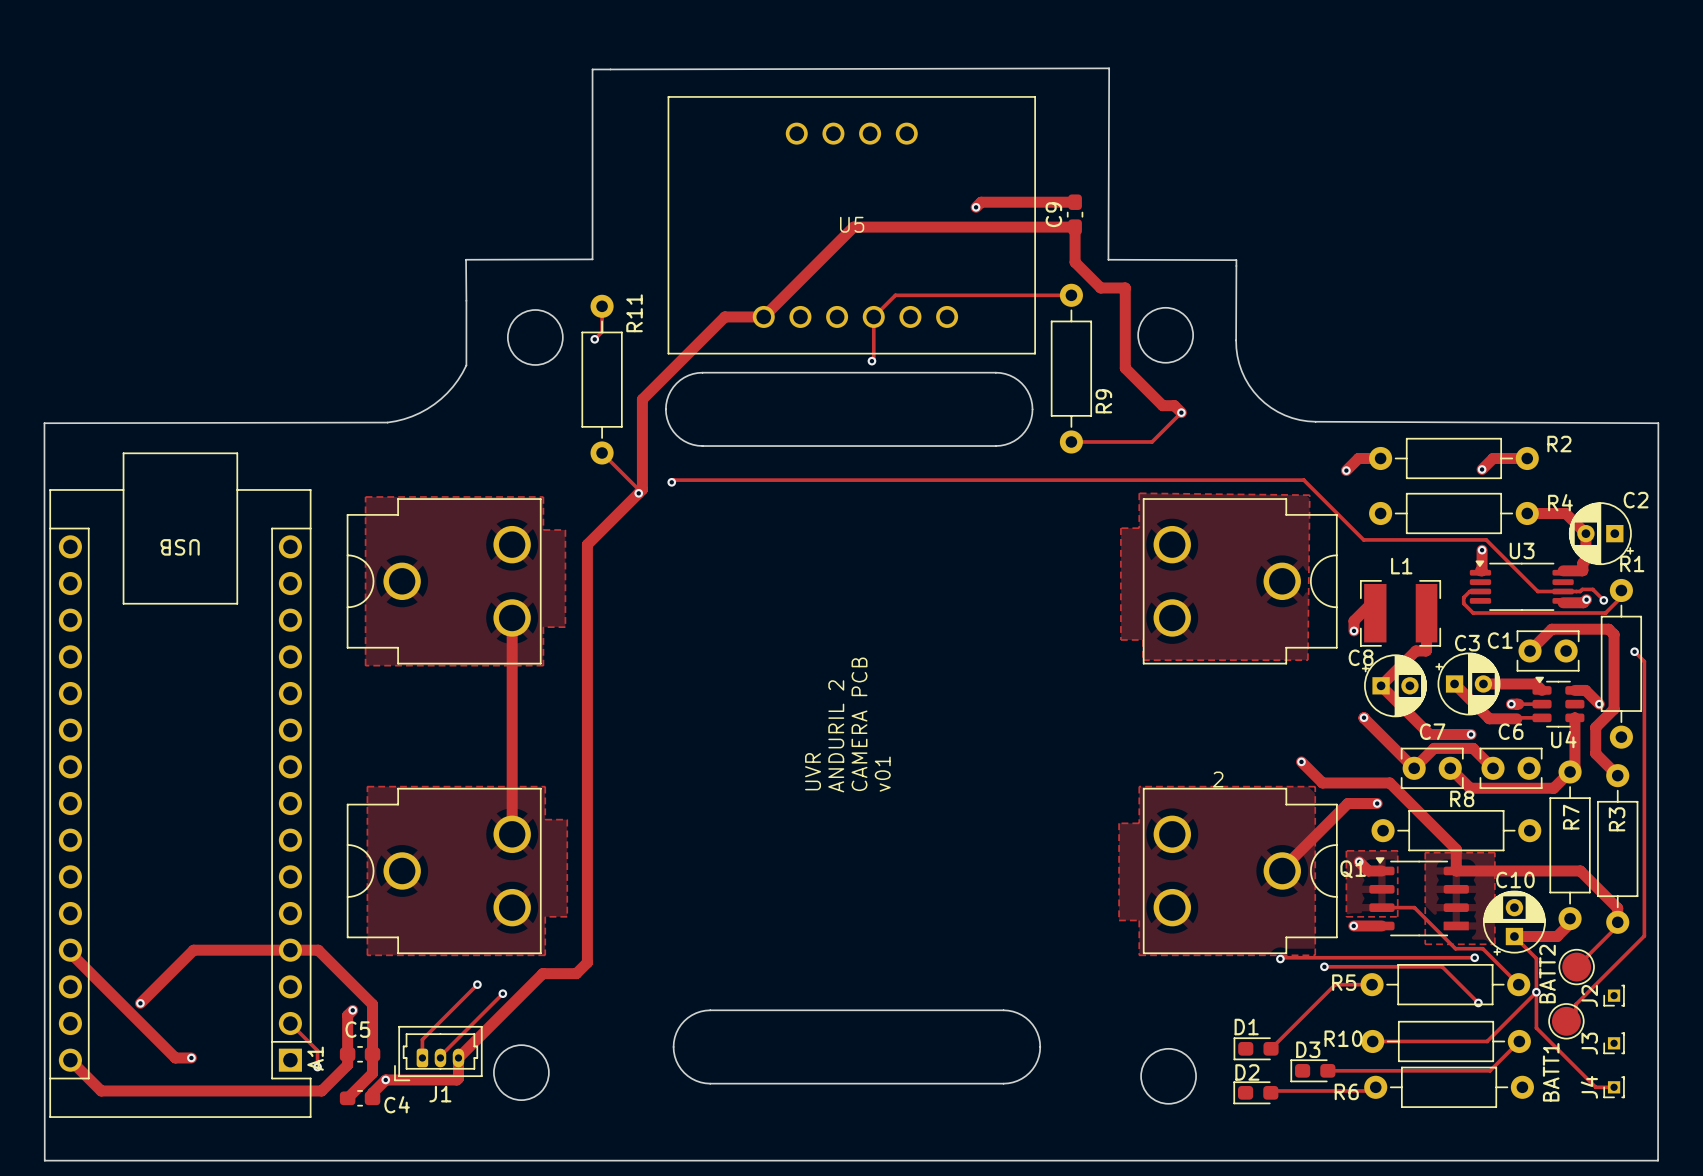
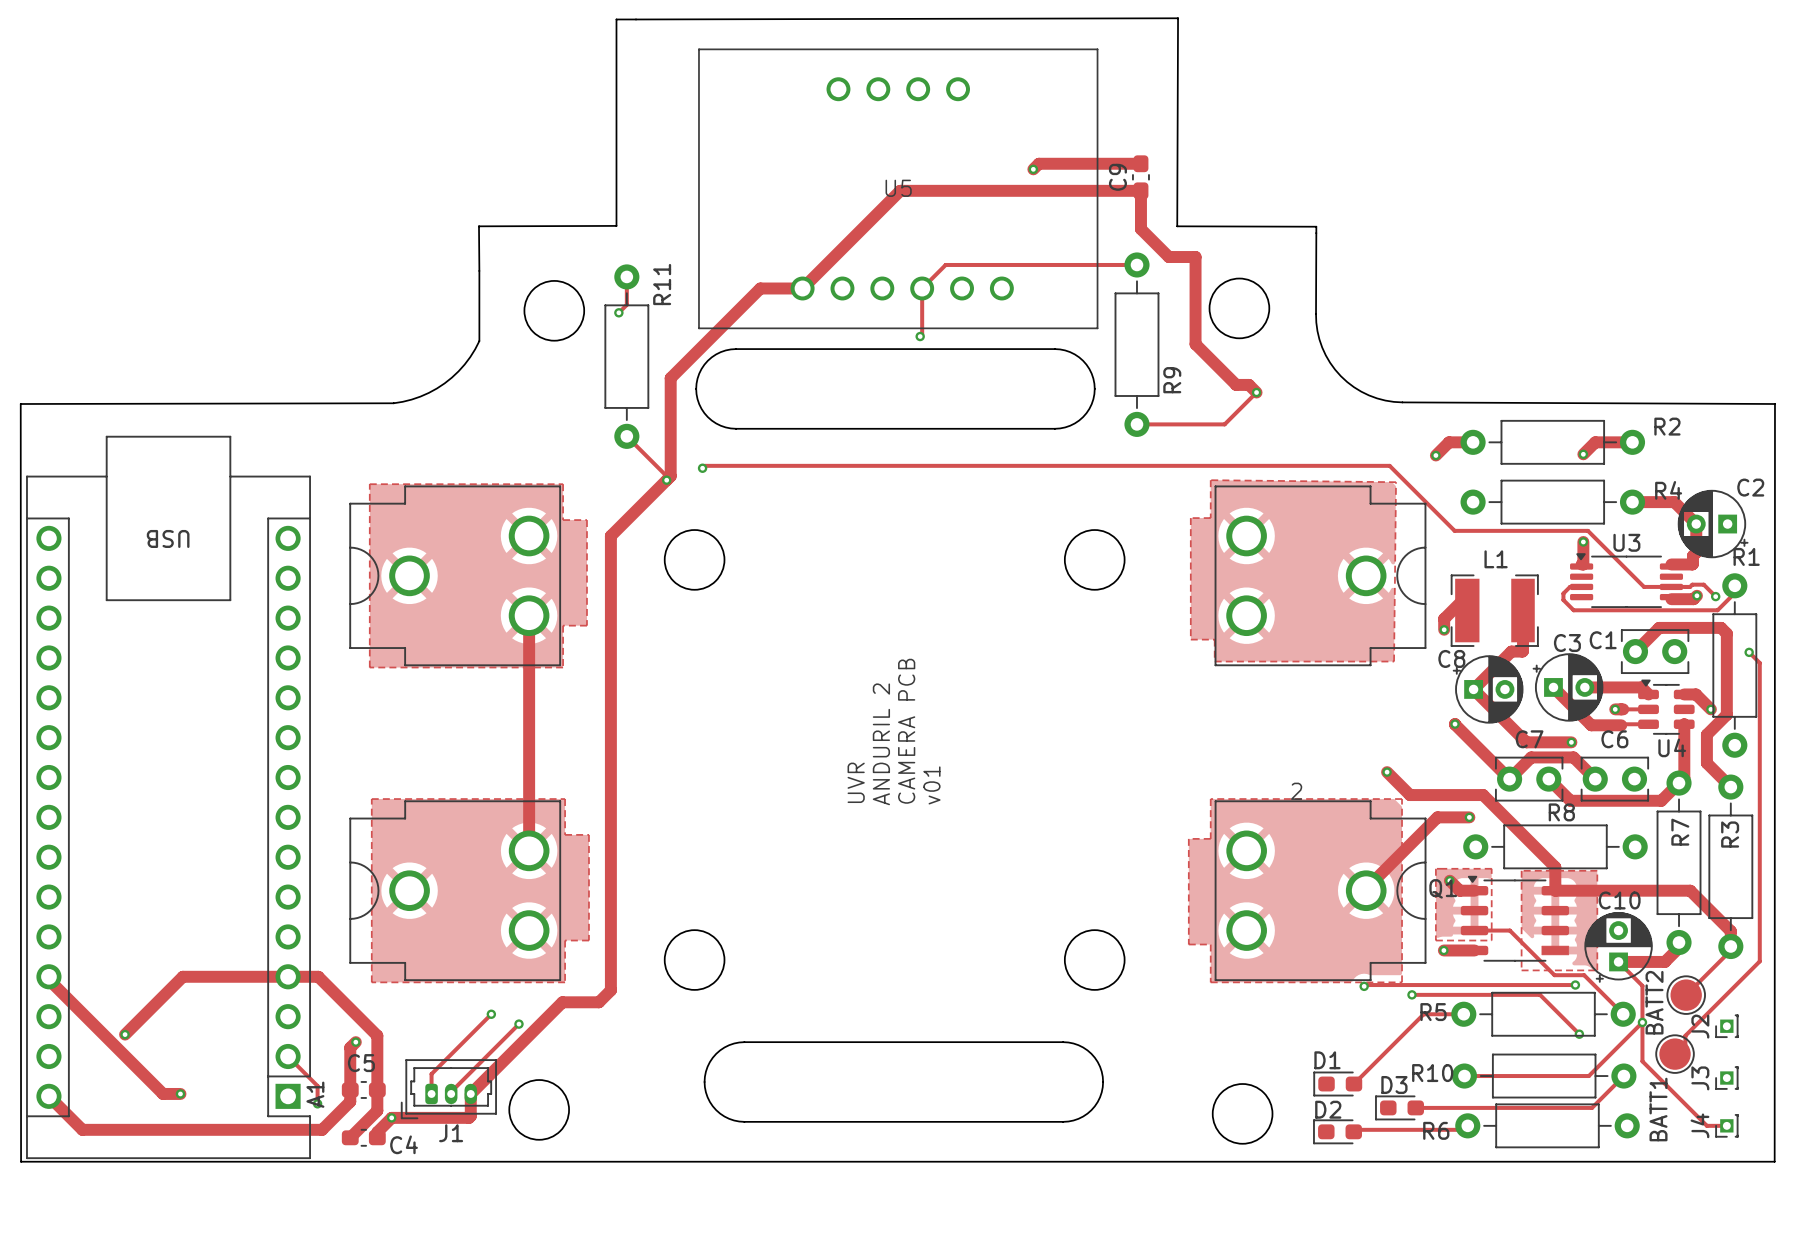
round board edge: none -> [664, 529, 725, 591]
round board edge: none -> [1064, 529, 1126, 591]
round board edge: none -> [664, 929, 725, 991]
round board edge: none -> [1064, 929, 1126, 991]
board edge: (44, 1120) (44, 1160) (1658, 1160) (1658, 1120) -> (21, 1161) (1774, 1161)

